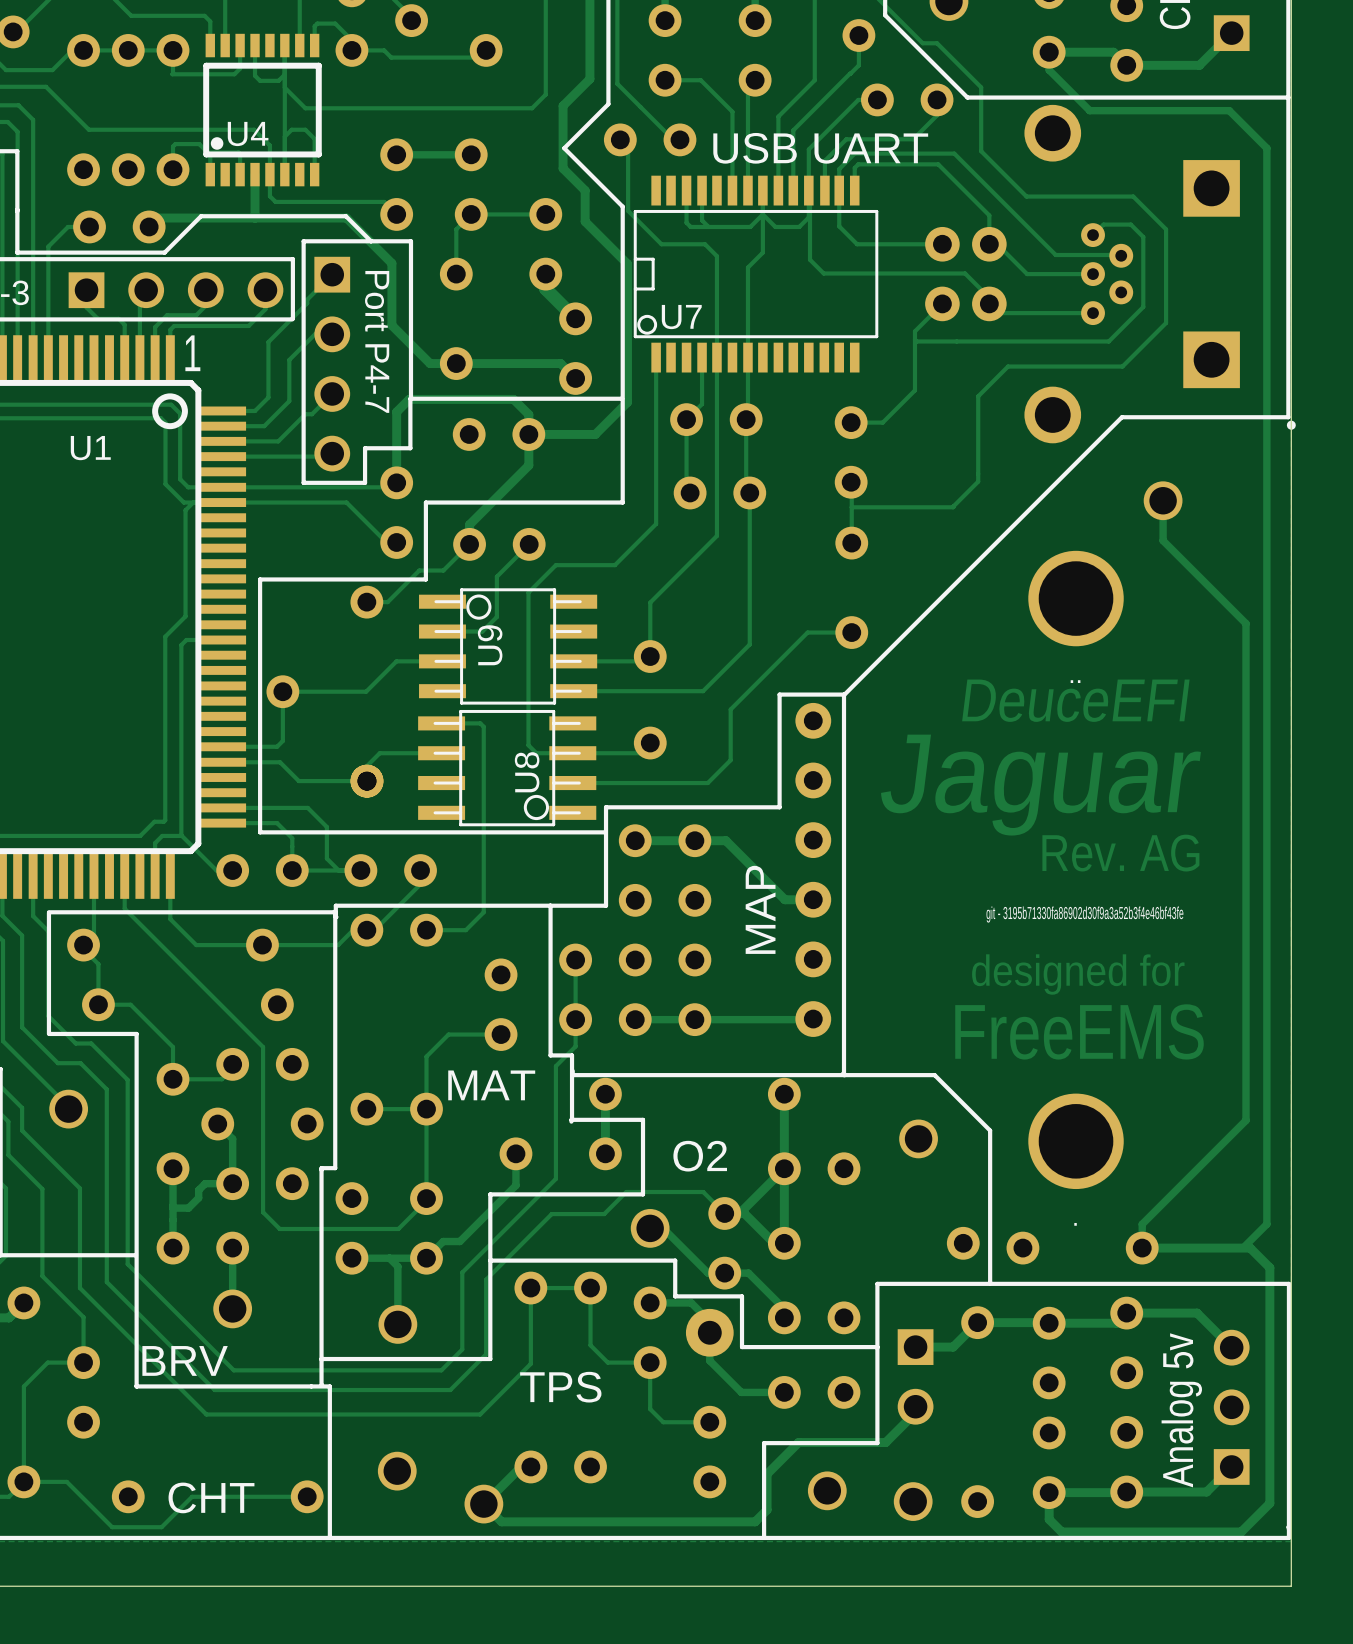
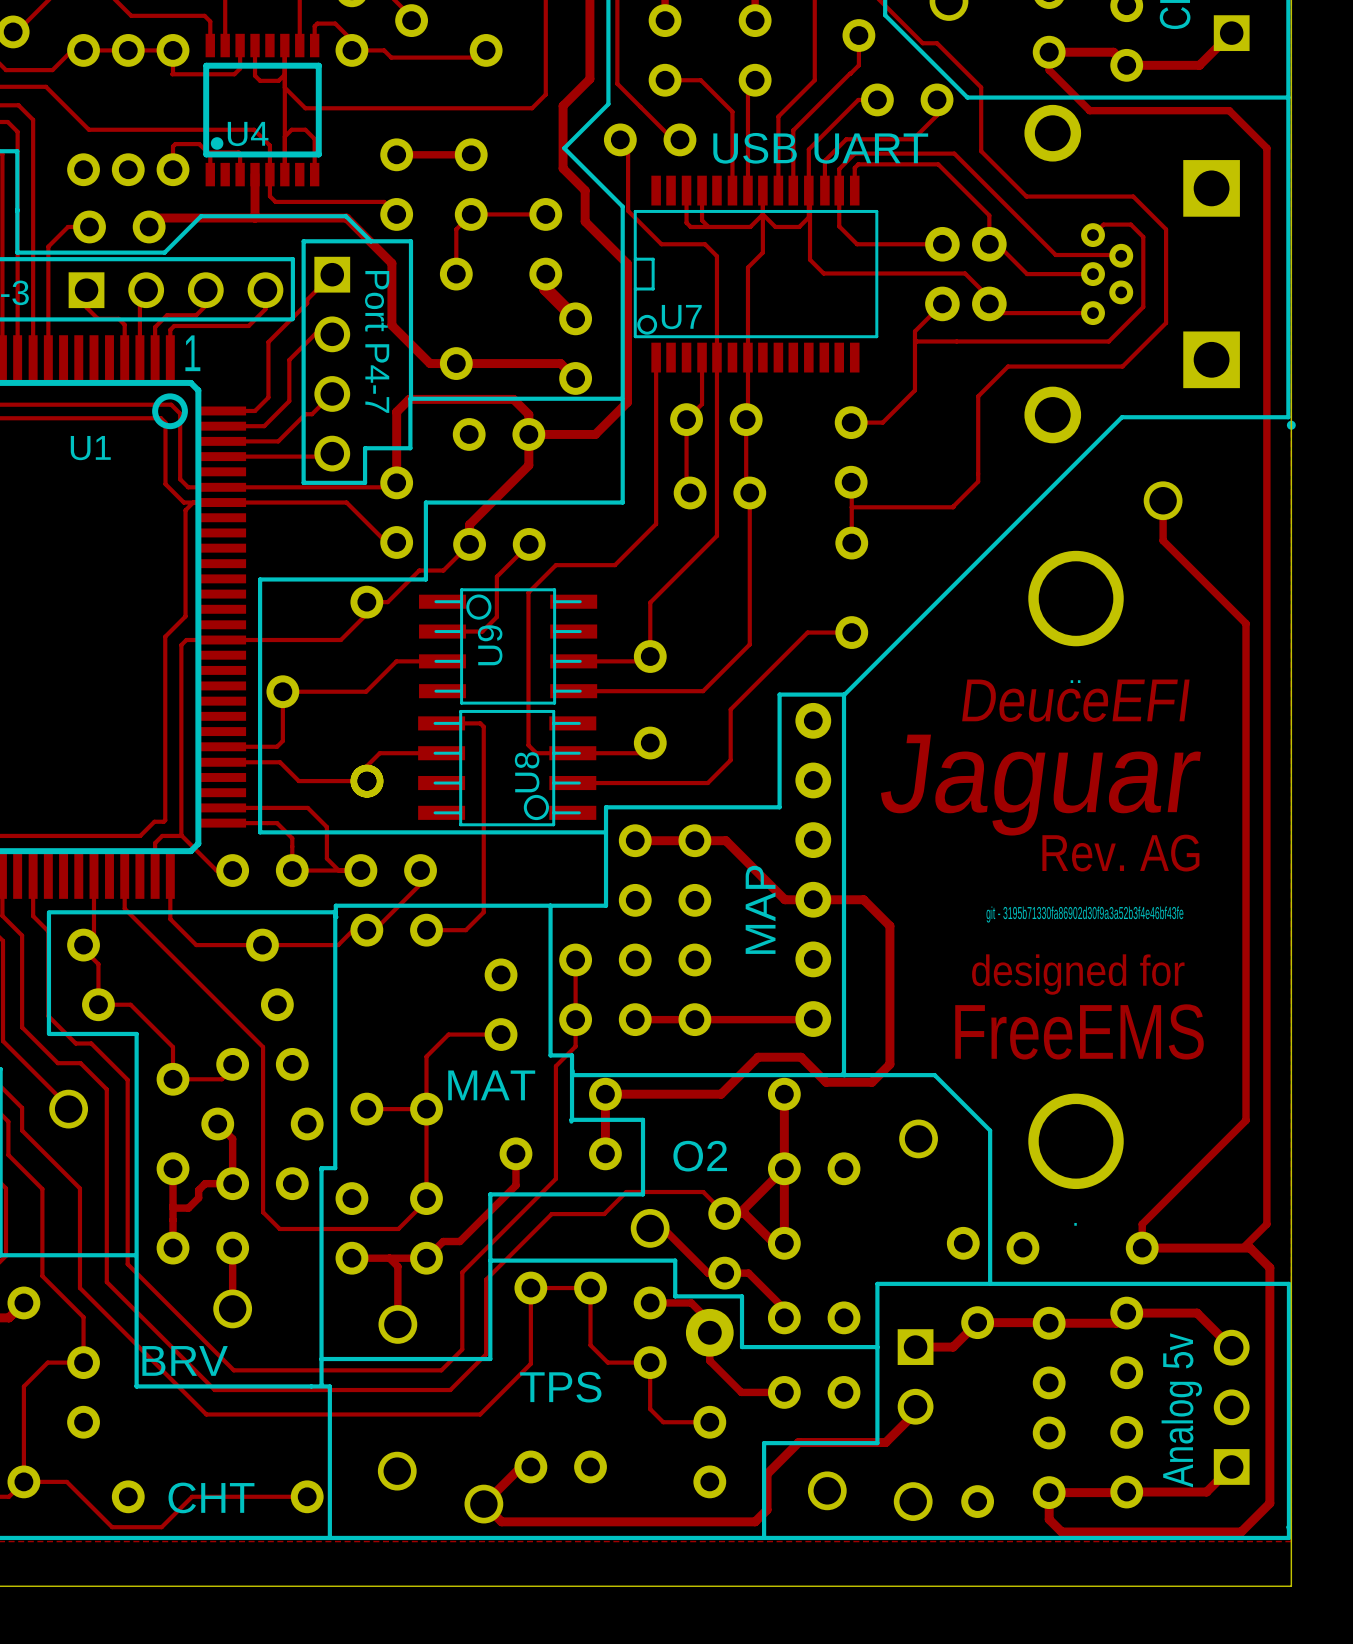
track: none -> (366, 602) (366, 614) (340, 640) (222, 640)
track: none -> (813, 899) (863, 899) (889, 926) (889, 1064) (872, 1082) (826, 1082) (801, 1057) (758, 1057) (721, 1094) (605, 1094)

